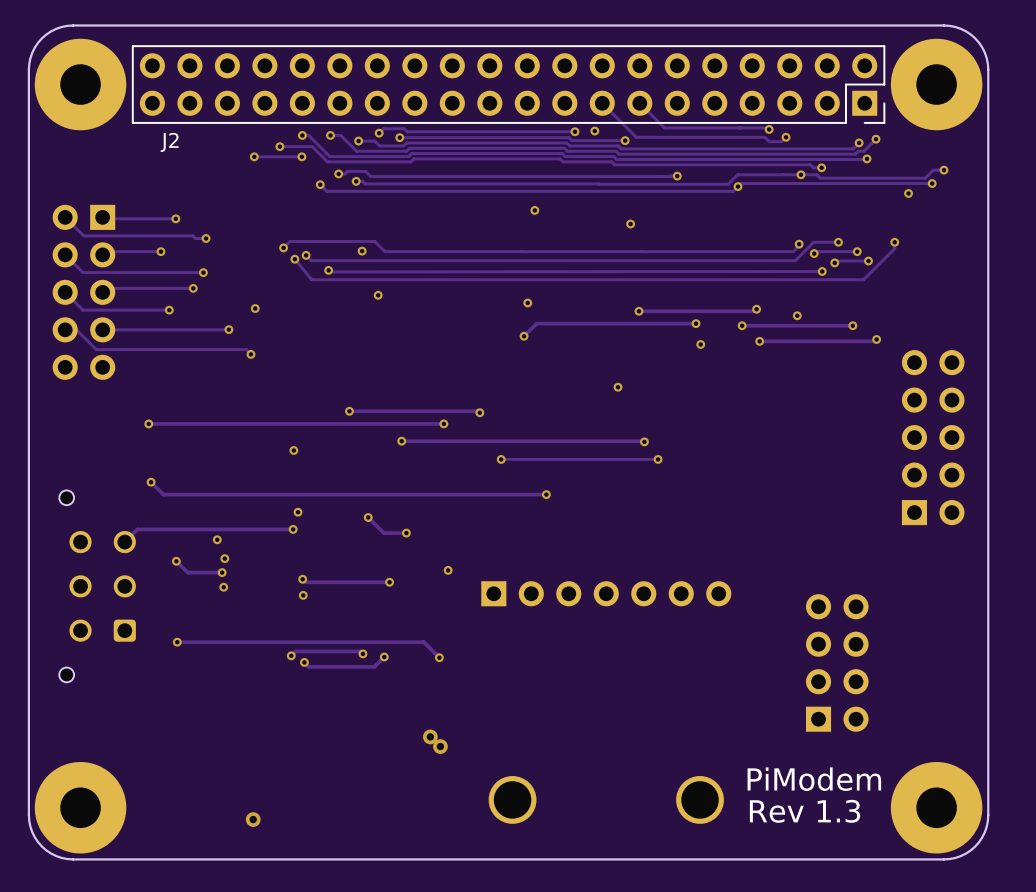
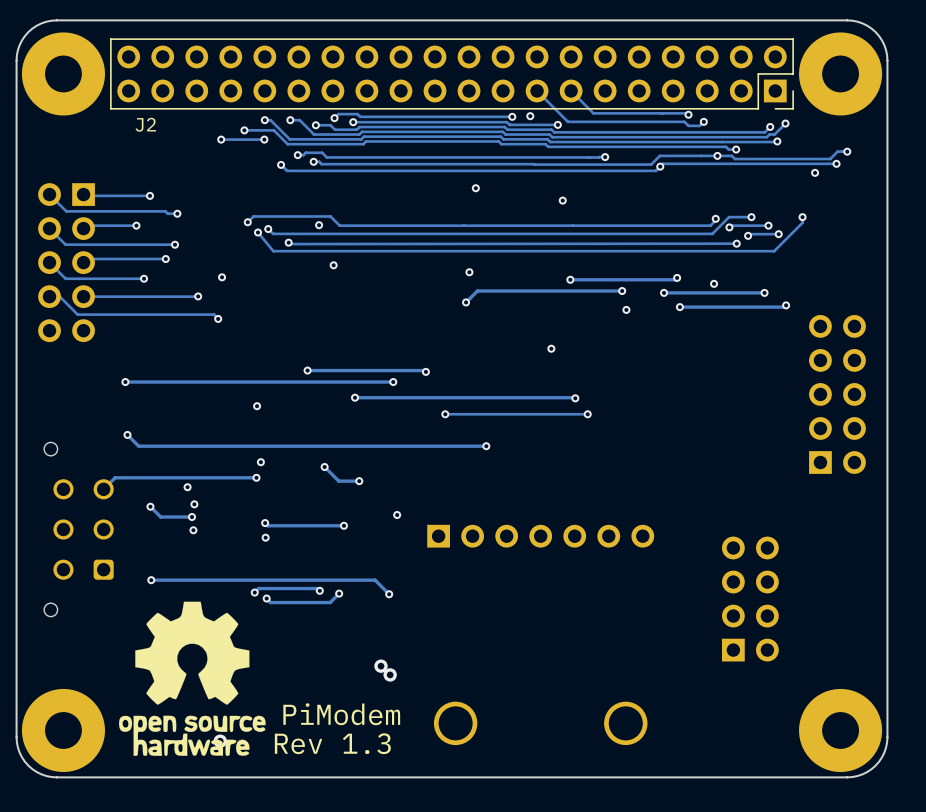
drawing: none -> [119, 601, 266, 756]
text: PiModem (814, 779) -> none
text: none -> PiModem (341, 714)
text: Rev 1.3 (805, 811) -> none
text: none -> Rev 1.3 (332, 743)

